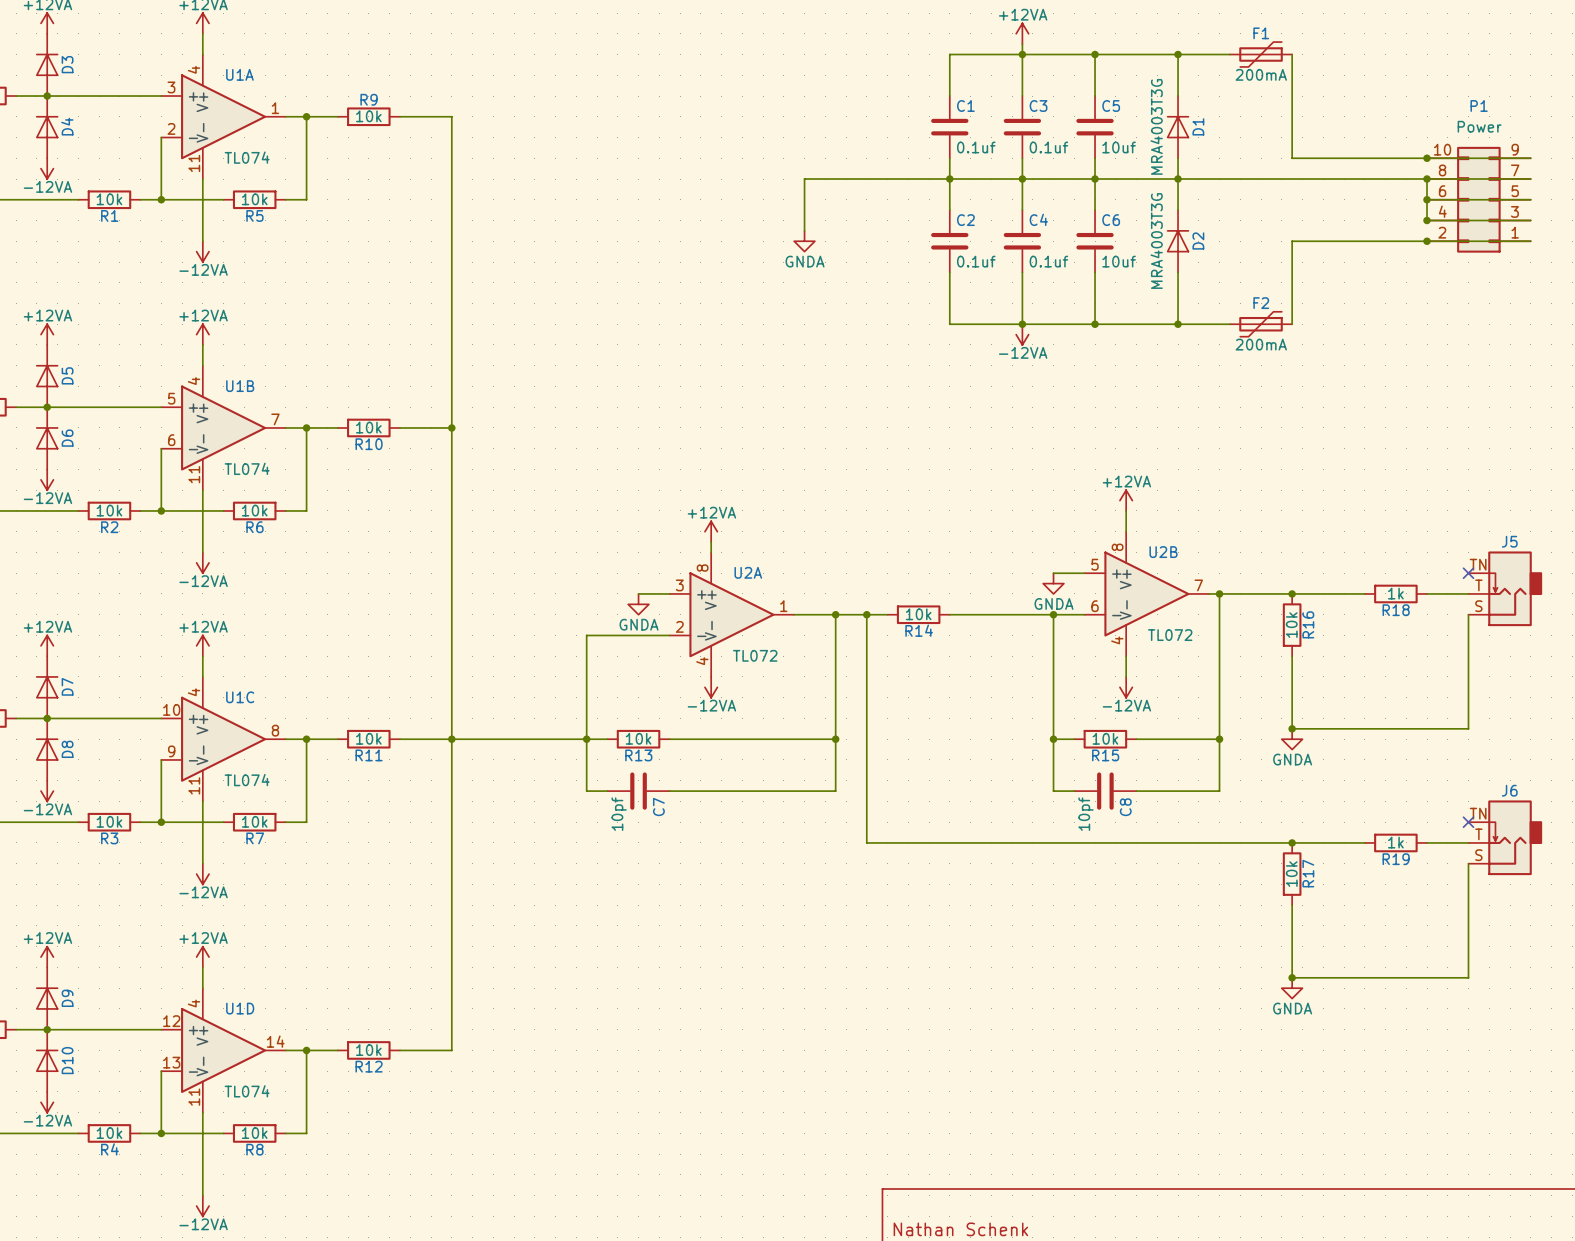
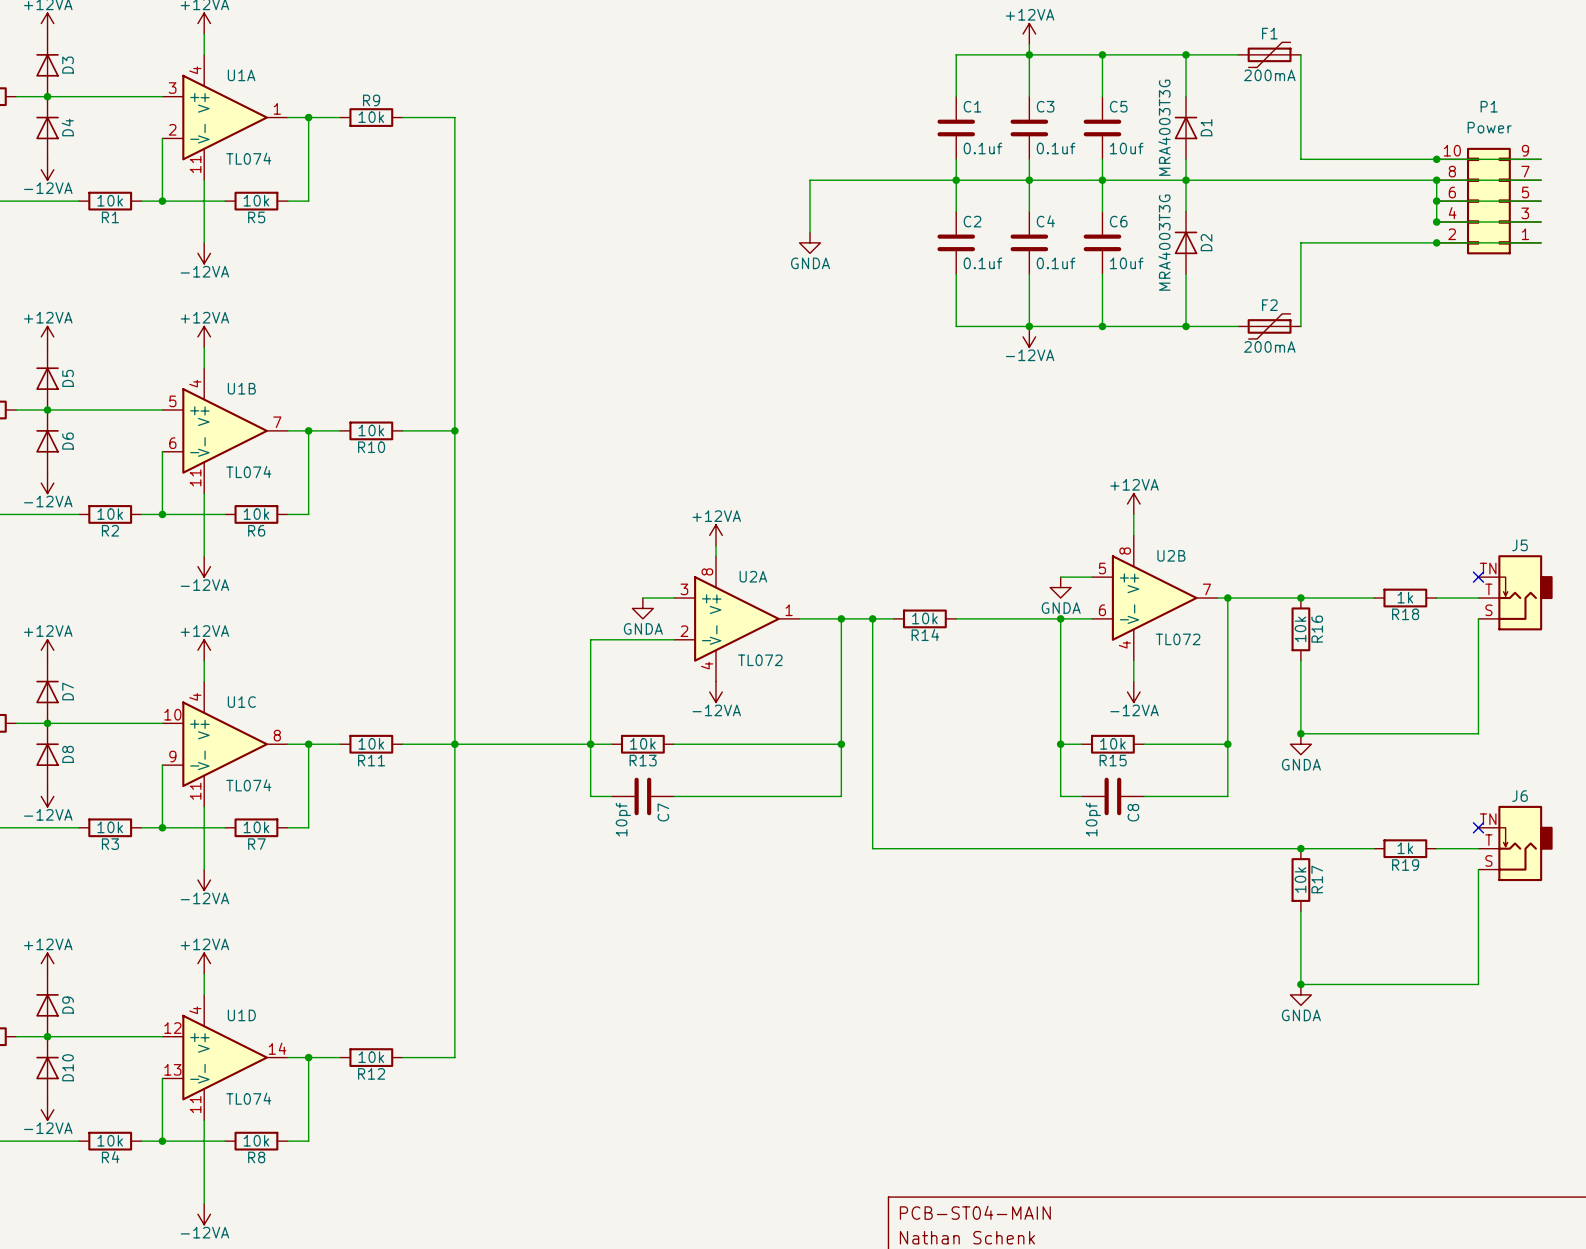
title block: none -> PCB-ST04-MAIN (975, 1212)

